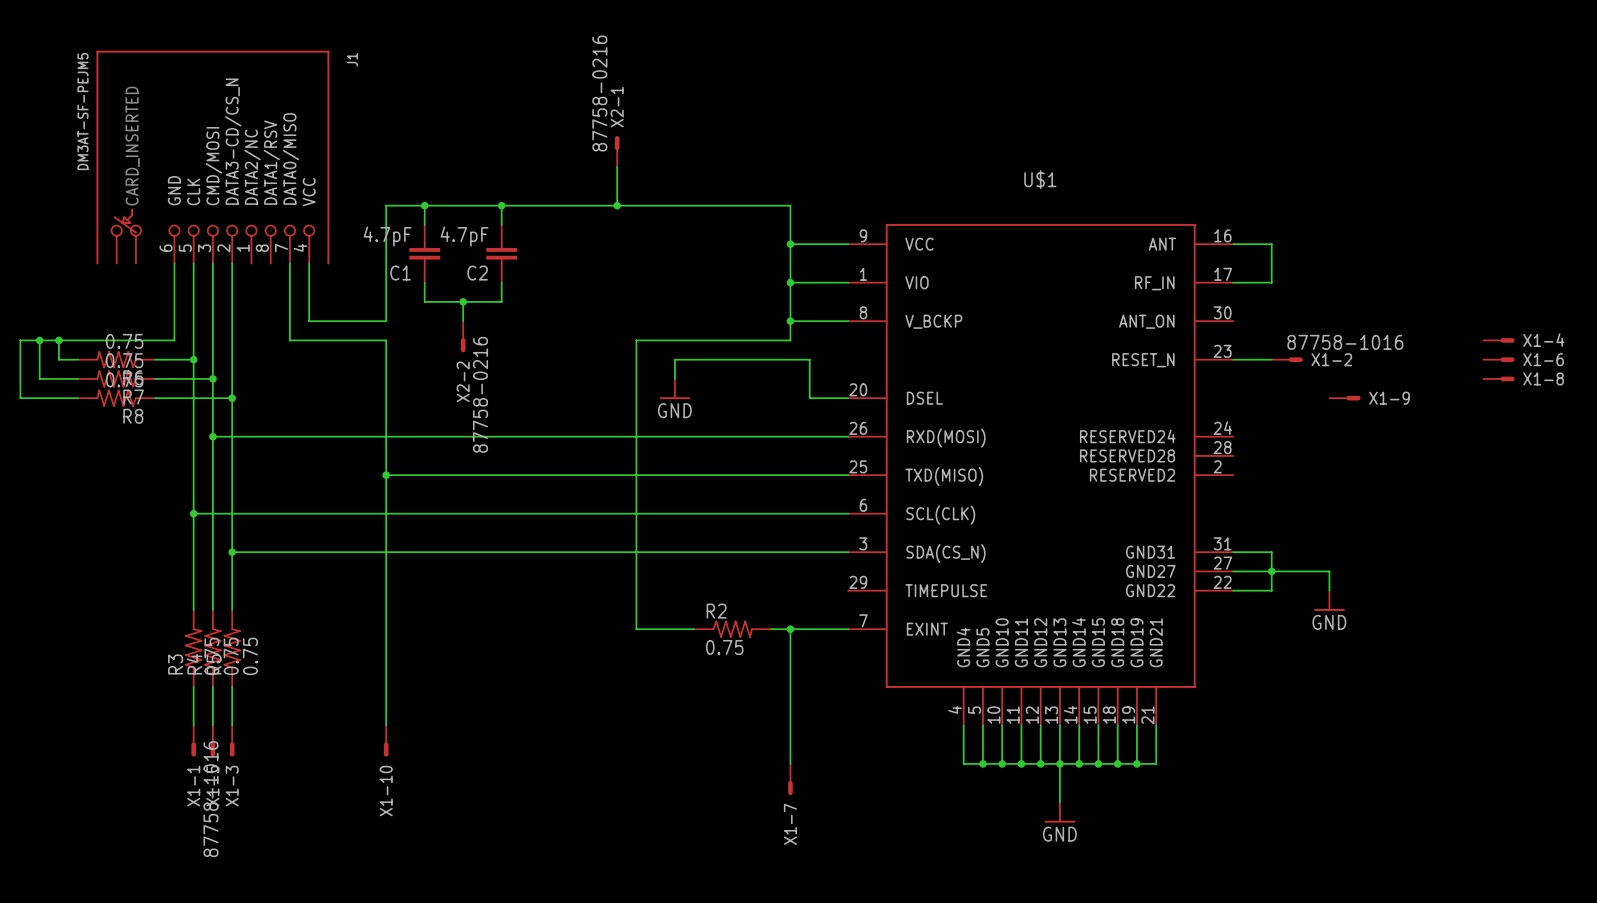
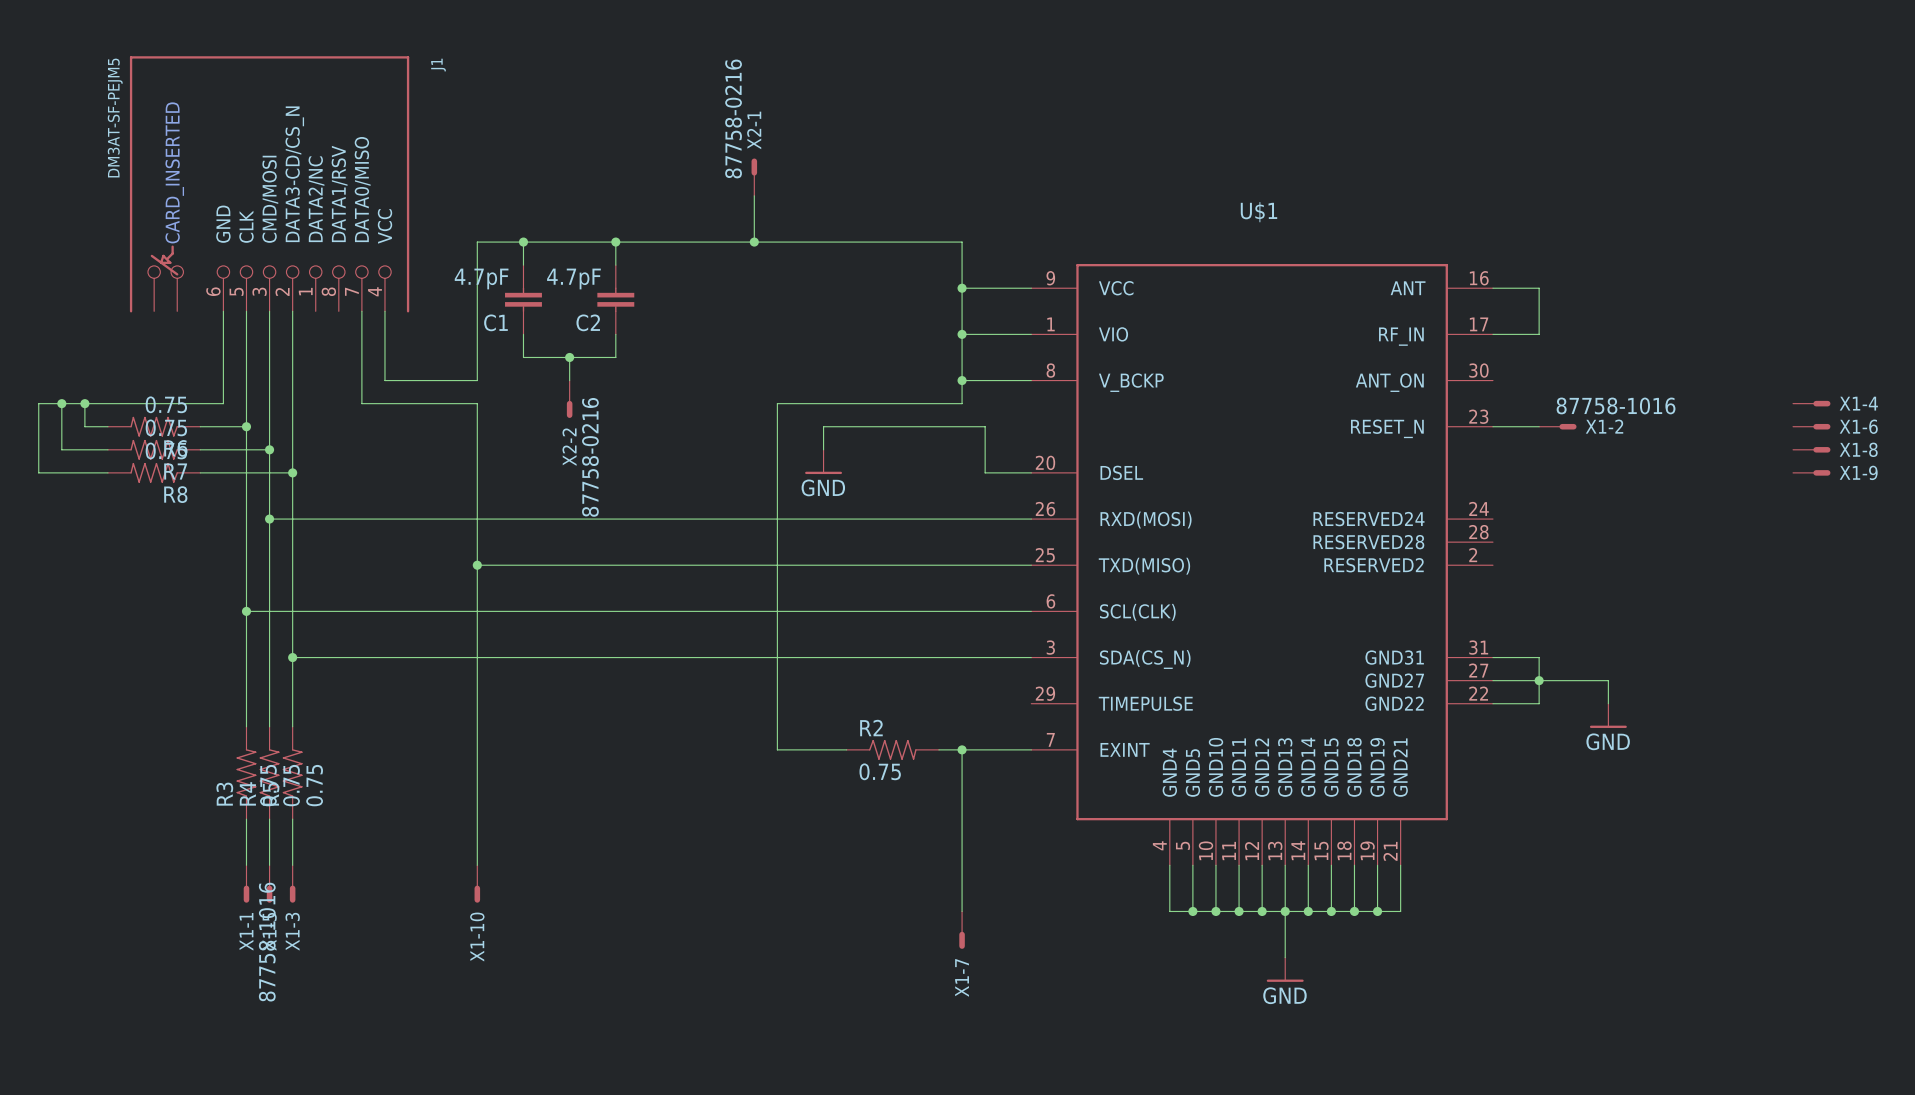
X1-9 position: (1345, 398) -> (1811, 472)

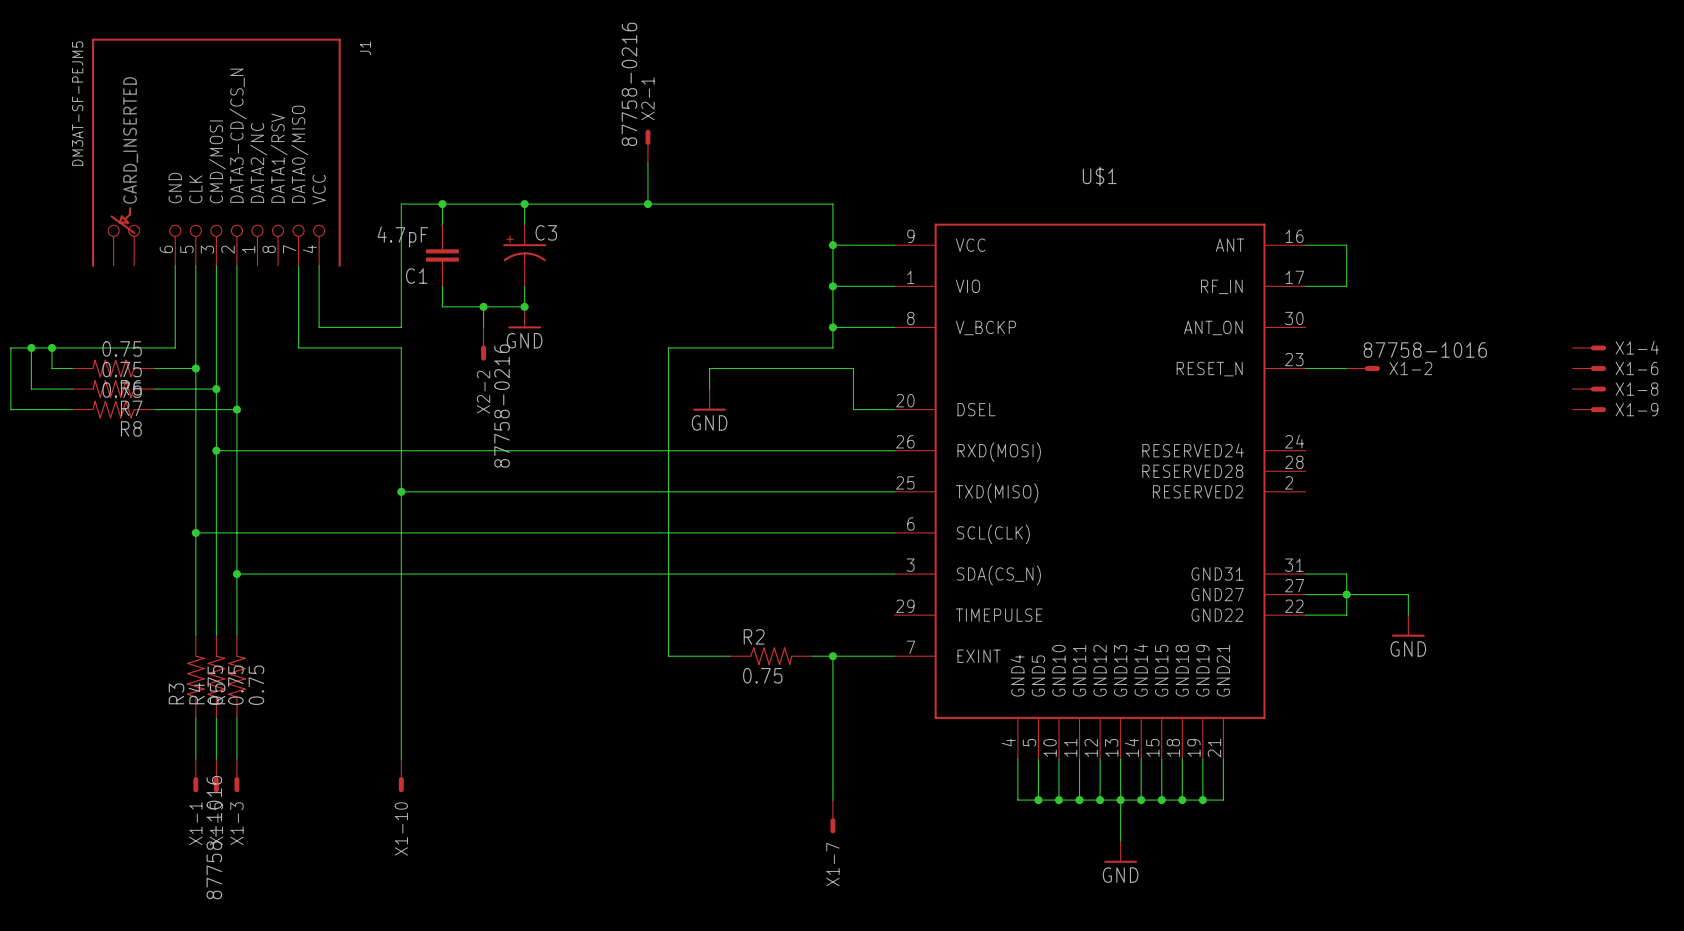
C2: 4.7pF (615, 299) -> none
C3: none -> (524, 255)
junction: none -> (524, 306)
power symbol: none -> GND (524, 317)

